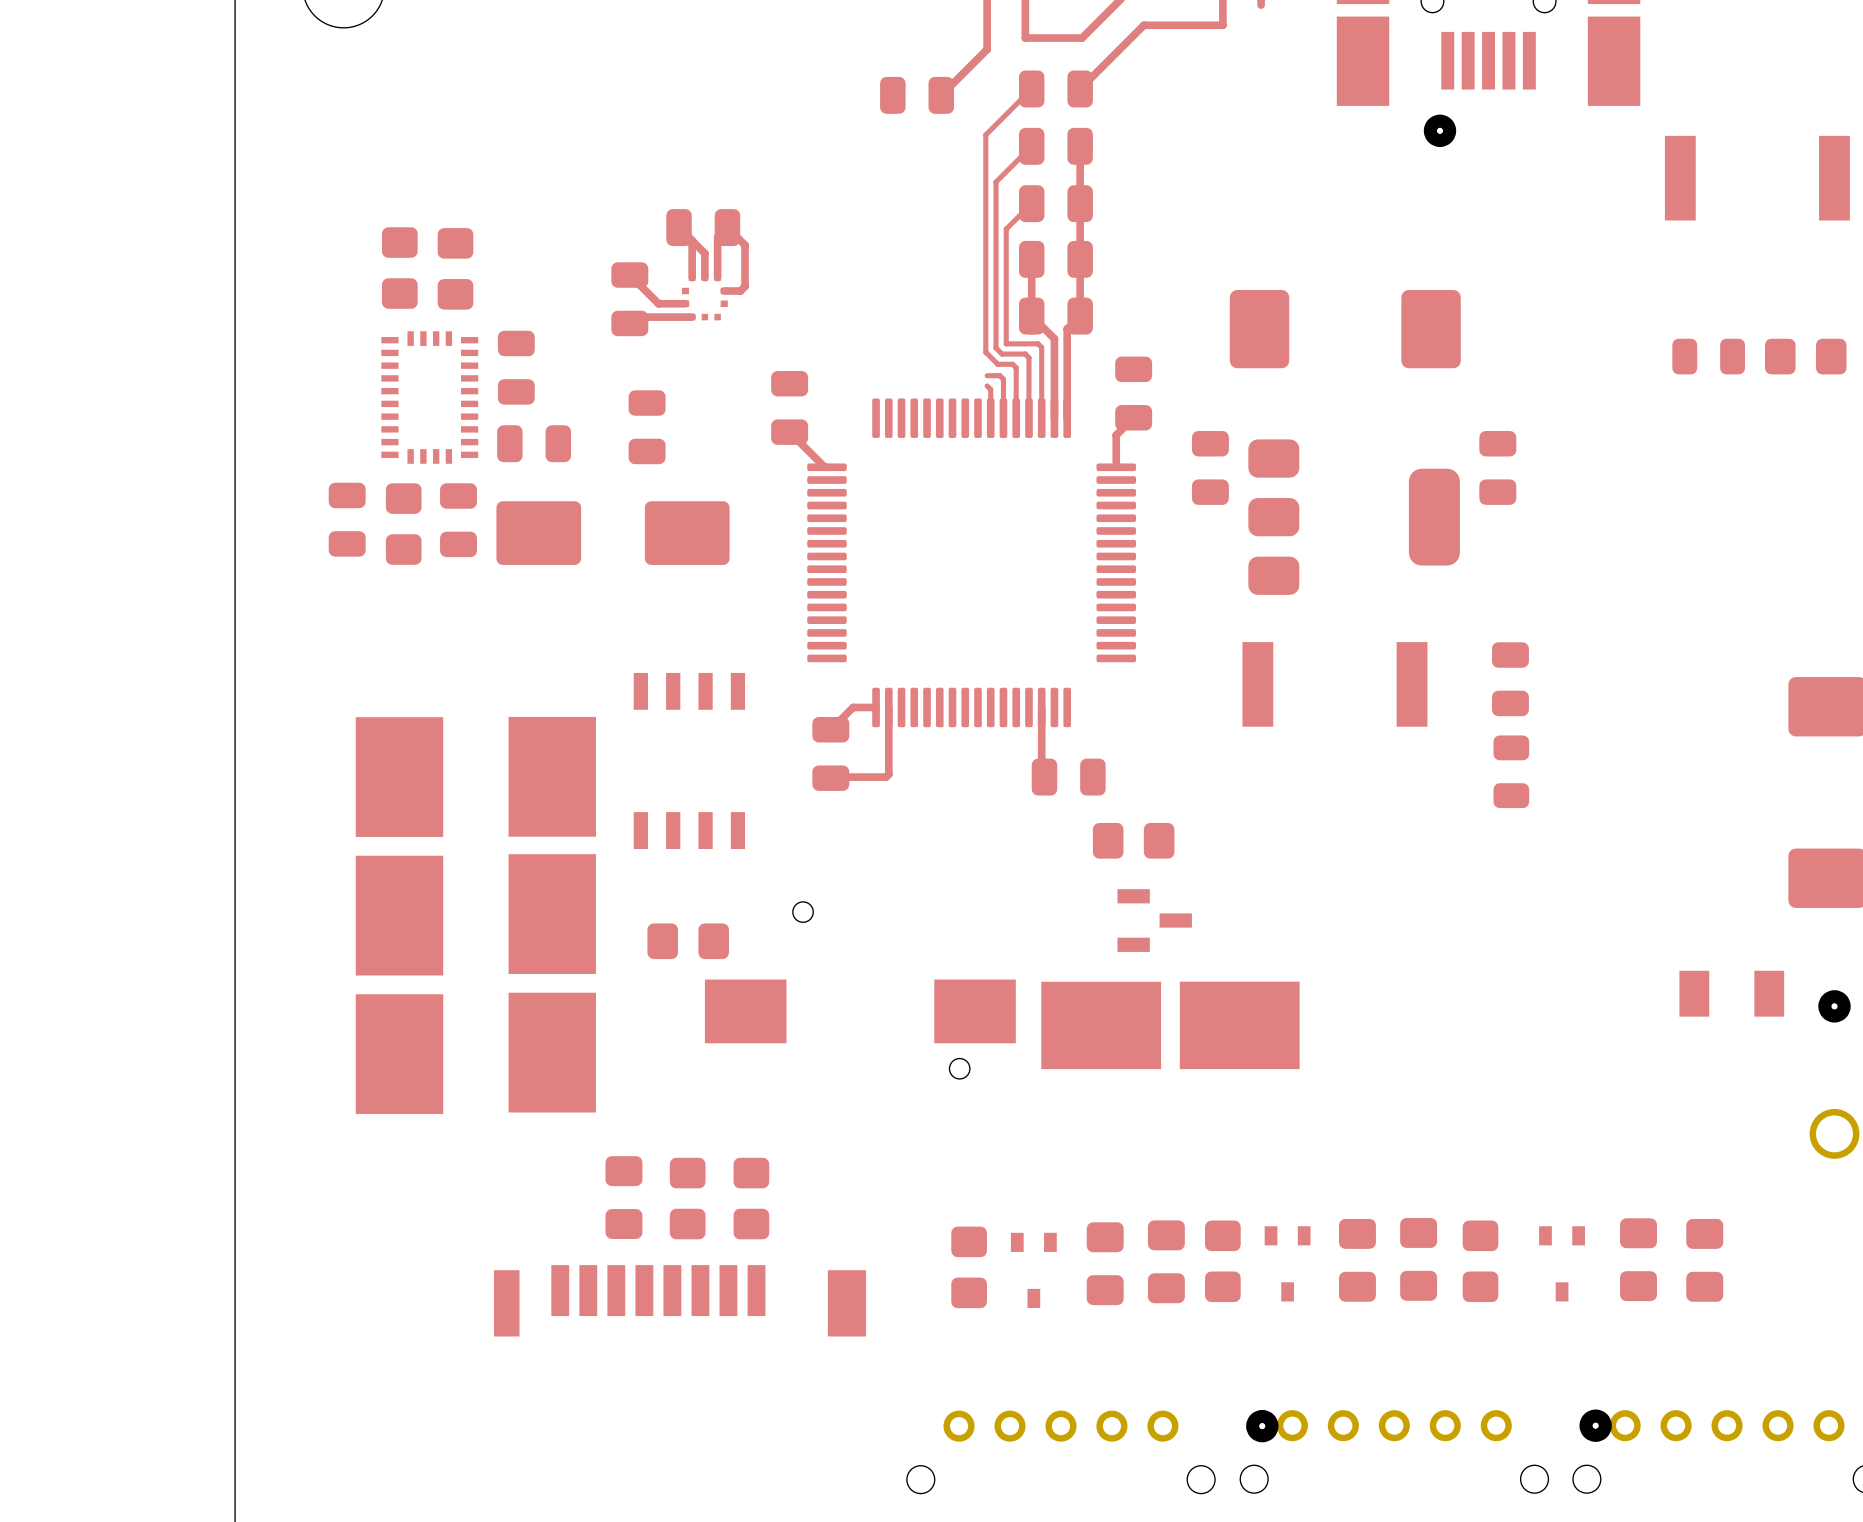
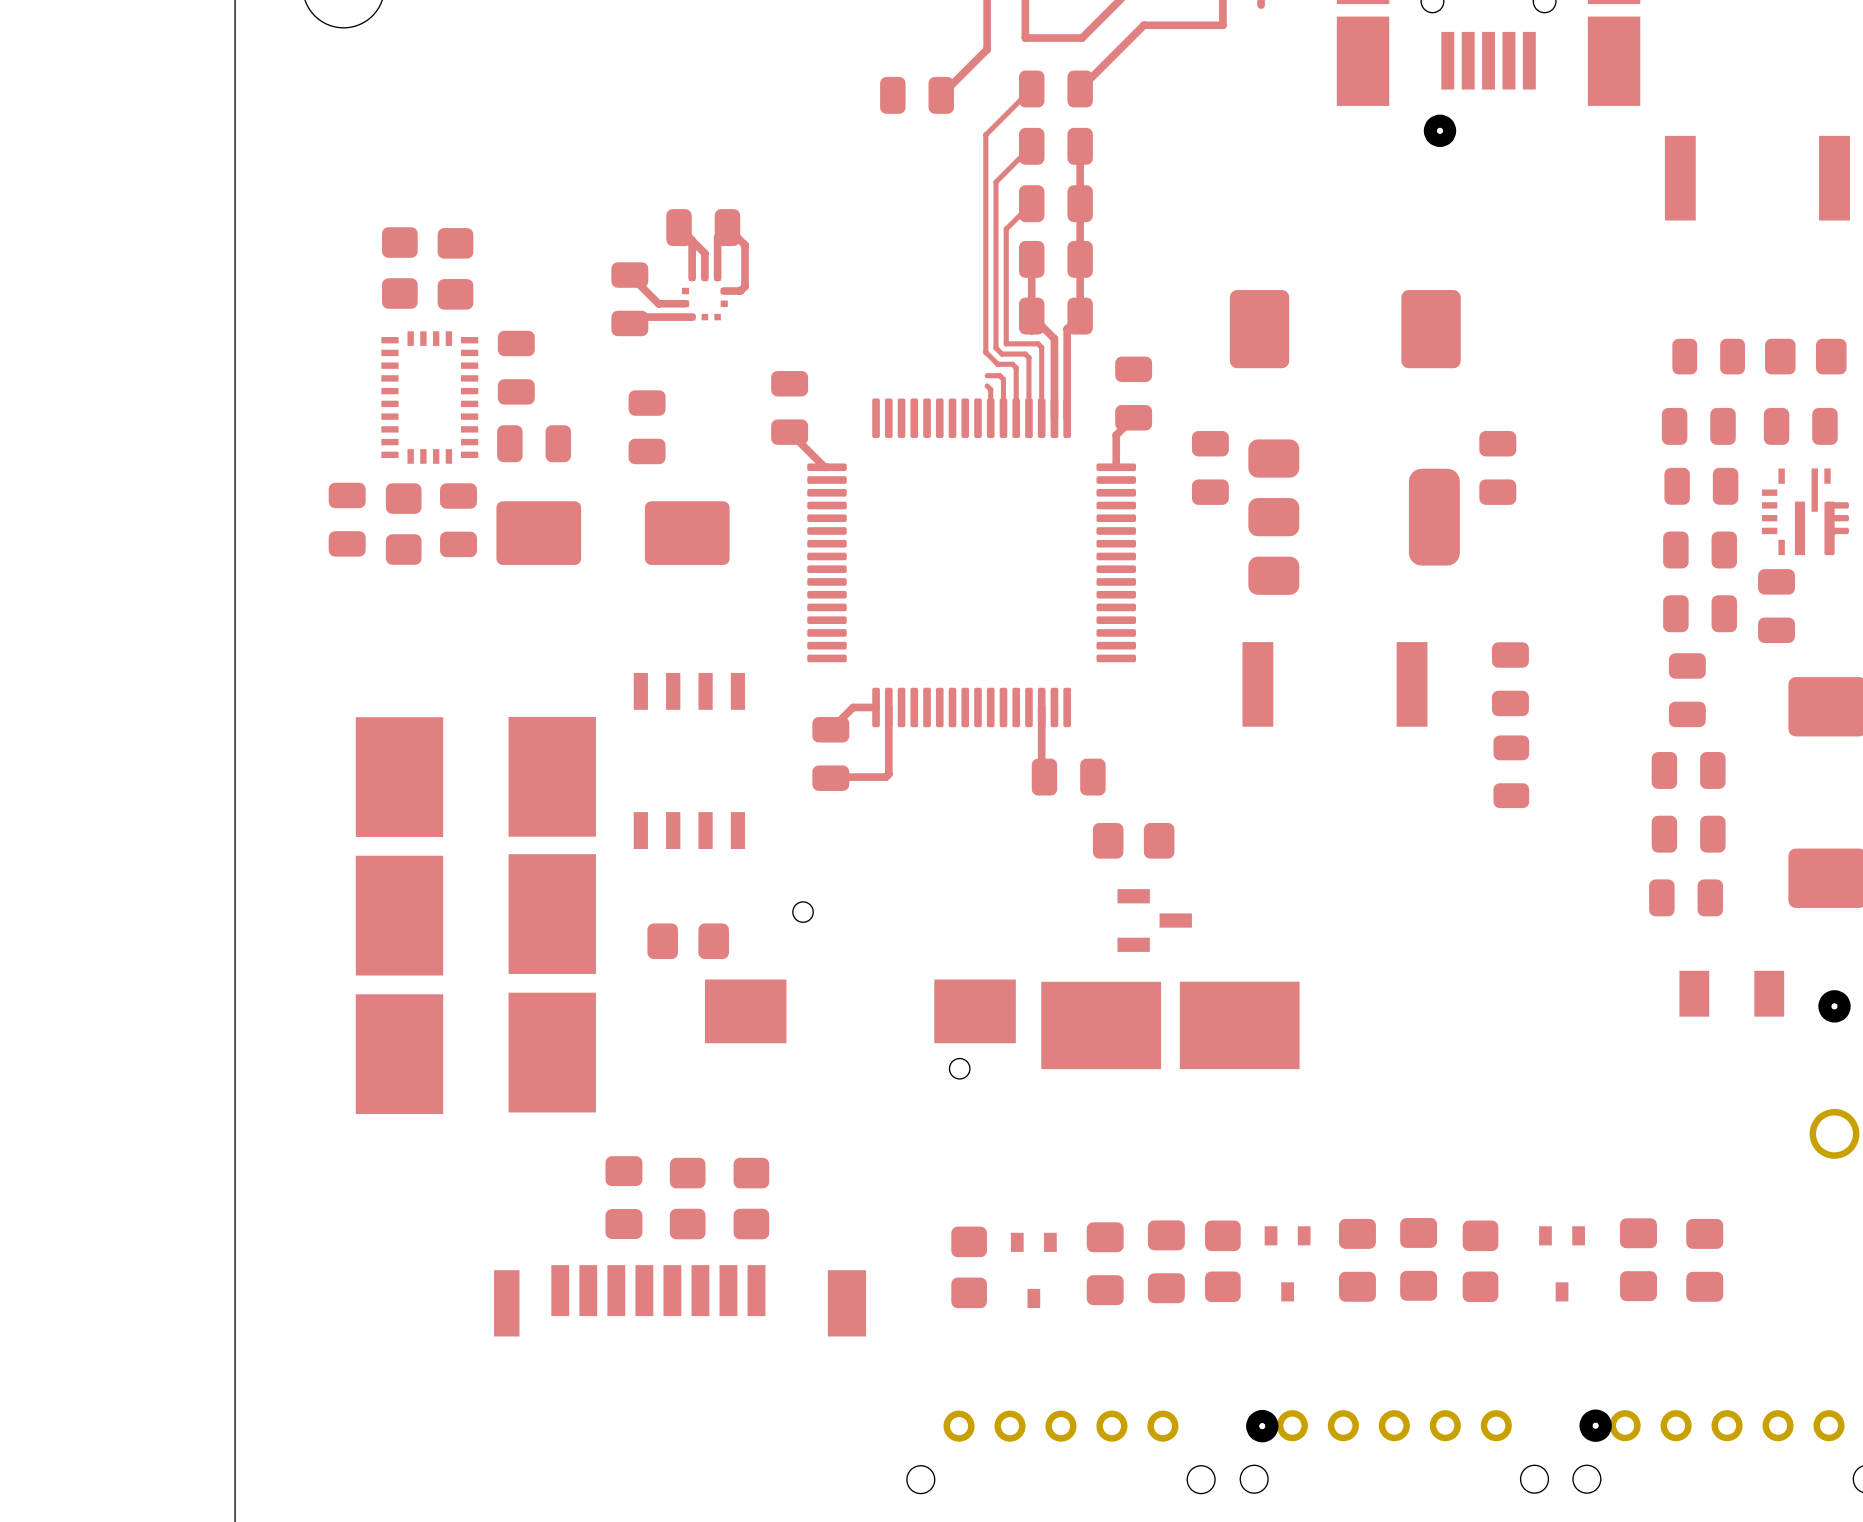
part: none -> (1698, 426)
part: none -> (1800, 426)
part: none -> (1701, 486)
part: none -> (1805, 511)
part: none -> (1700, 550)
part: none -> (1776, 606)
part: none -> (1700, 613)
part: none -> (1687, 690)
part: none -> (1688, 770)
part: none -> (1688, 834)
part: none -> (1686, 897)

